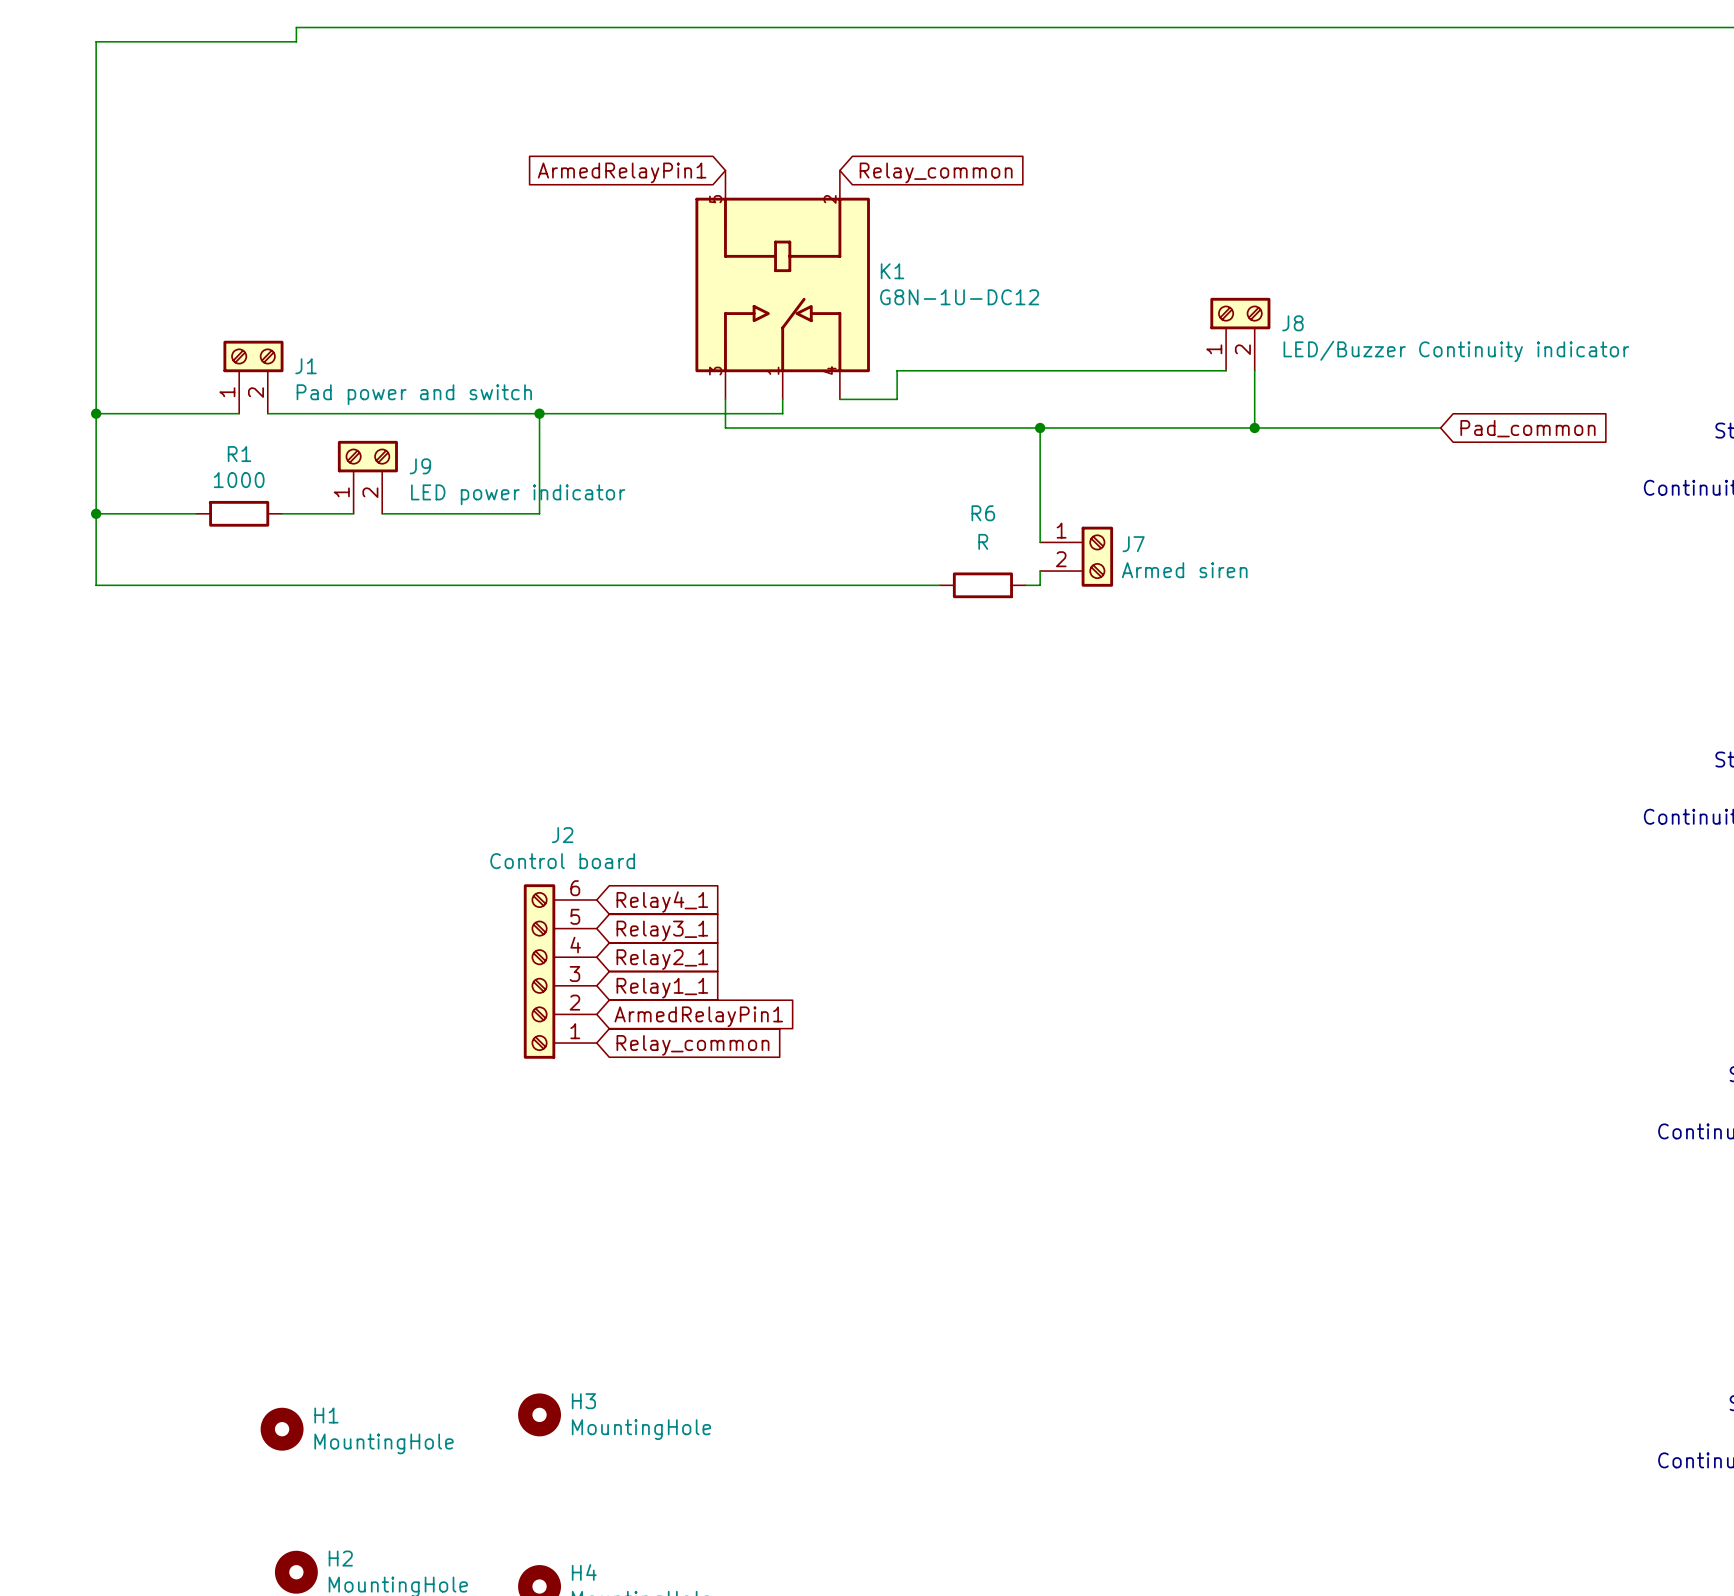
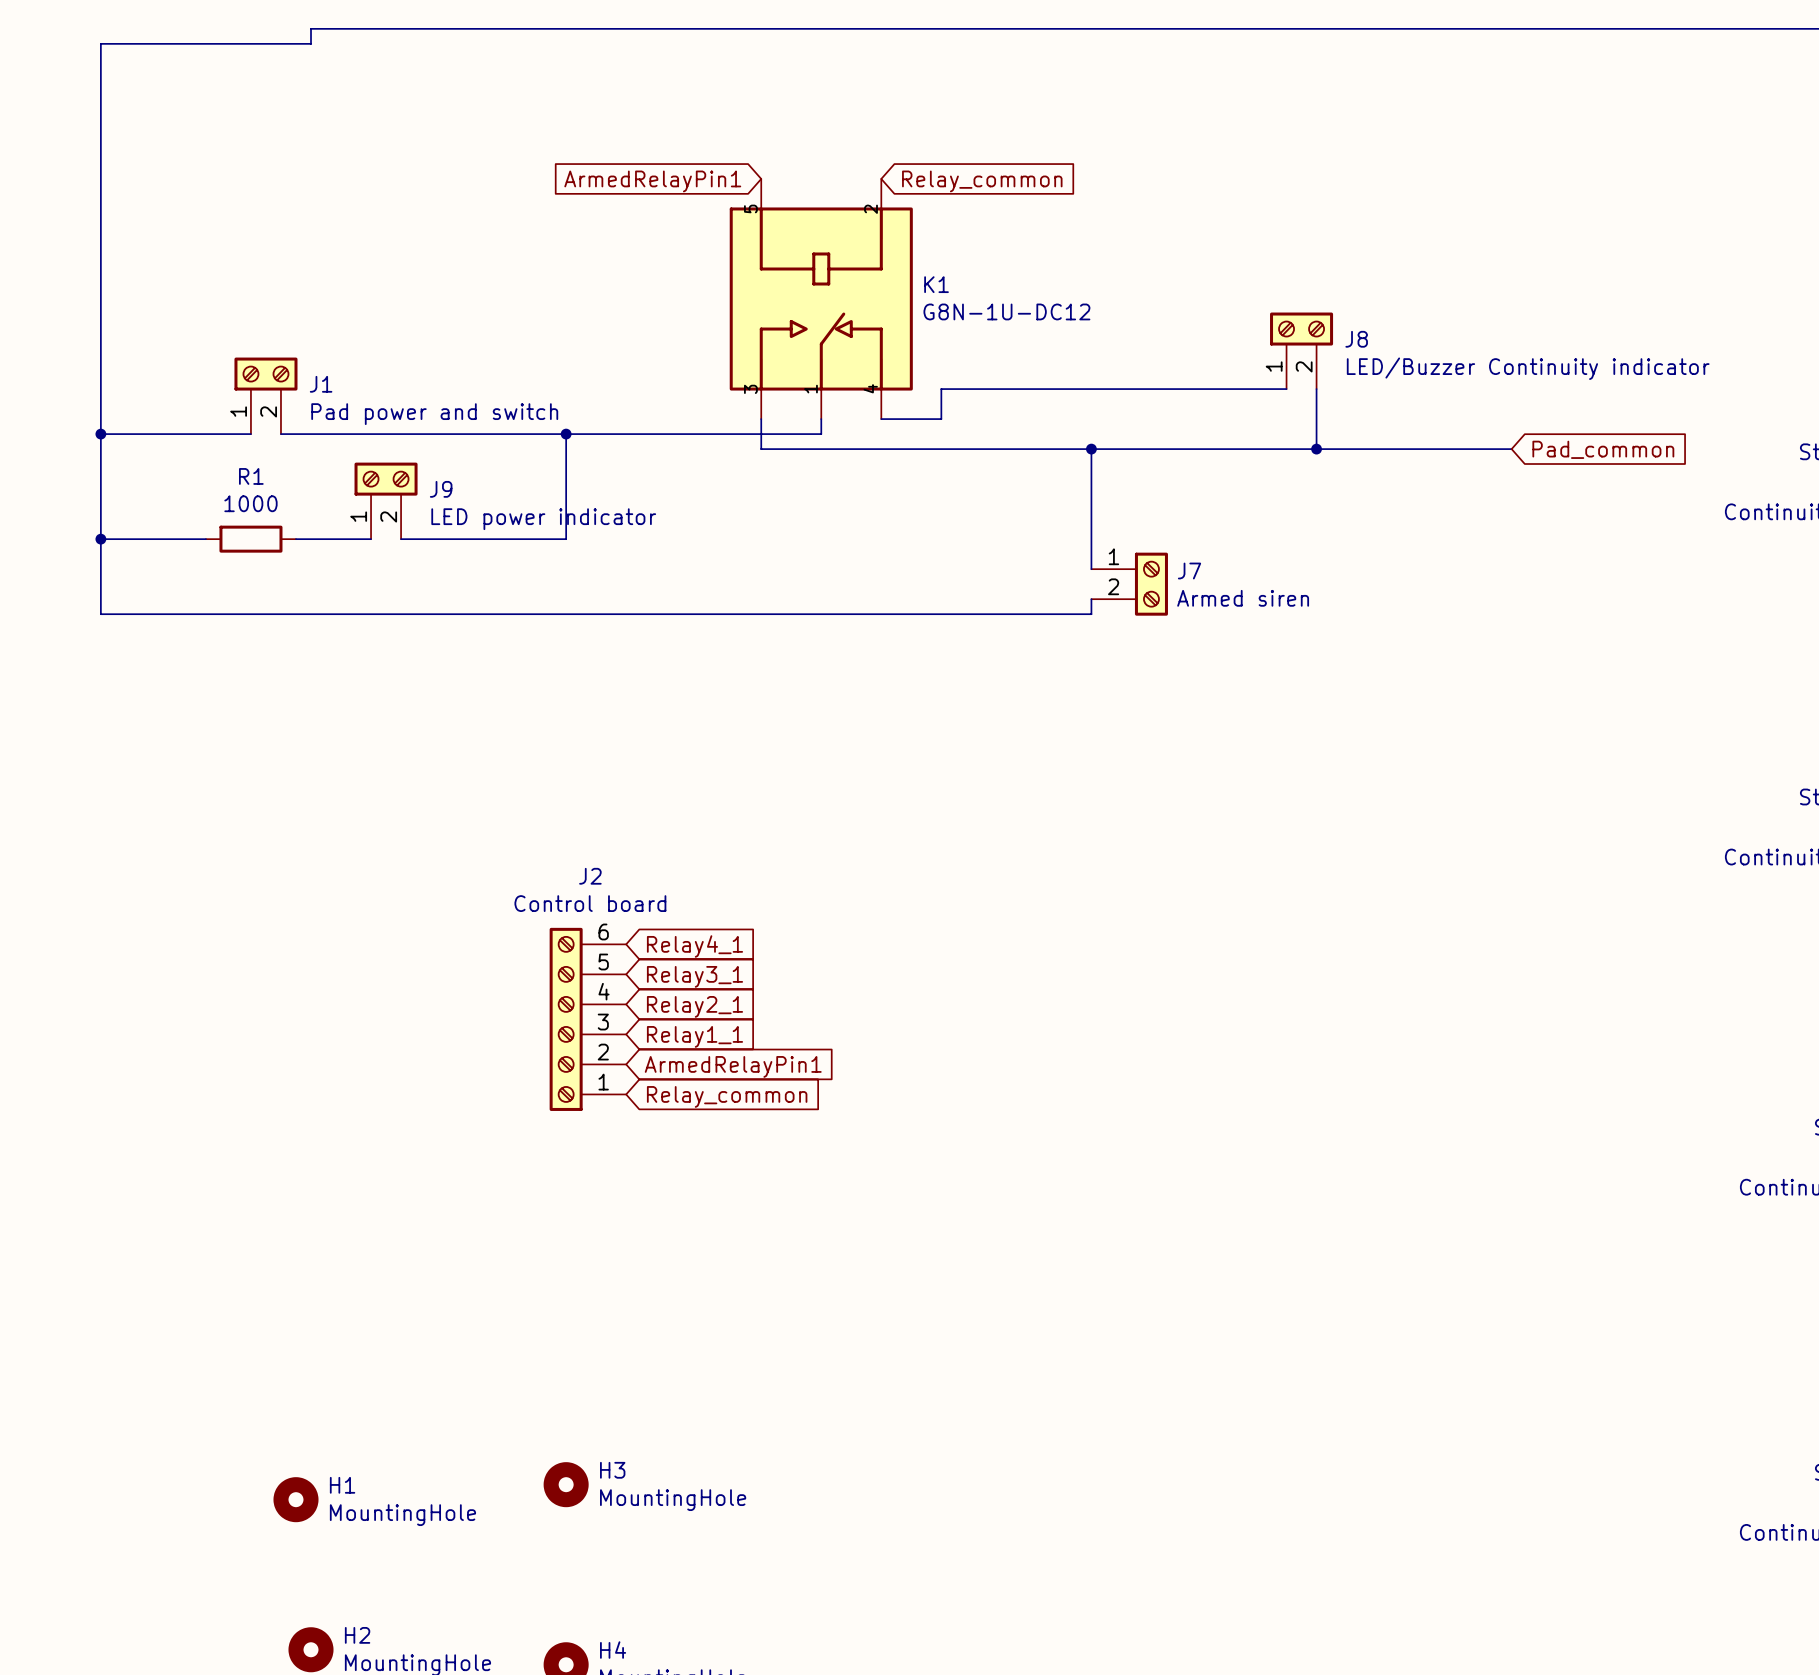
wire: none -> (986, 614) (1076, 614)
R6: R (982, 585) -> none

